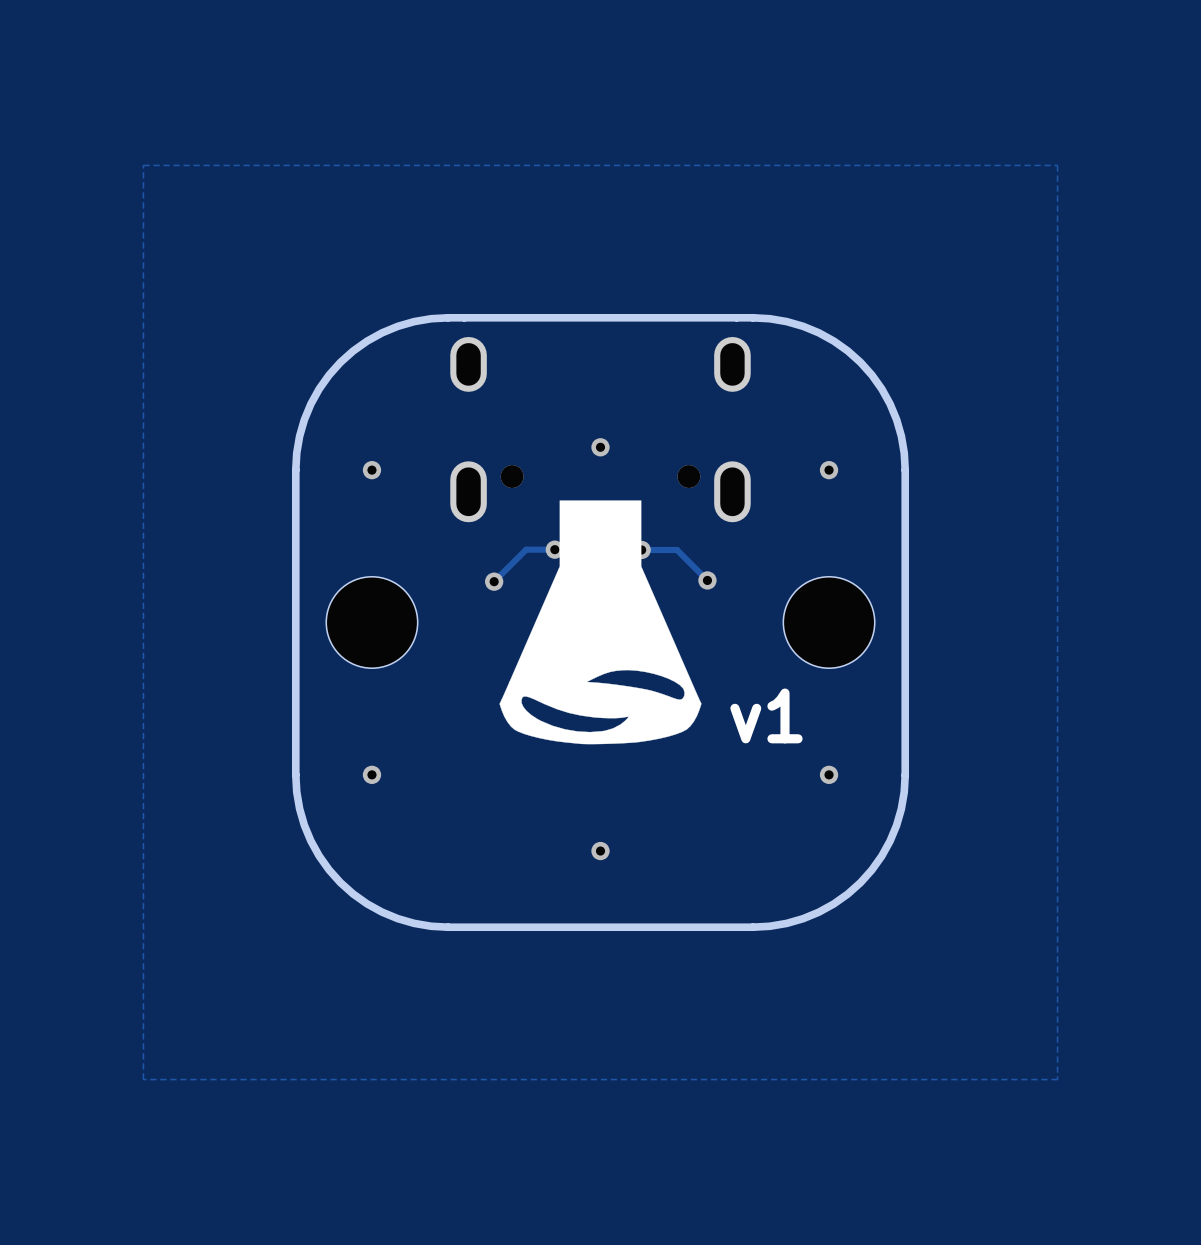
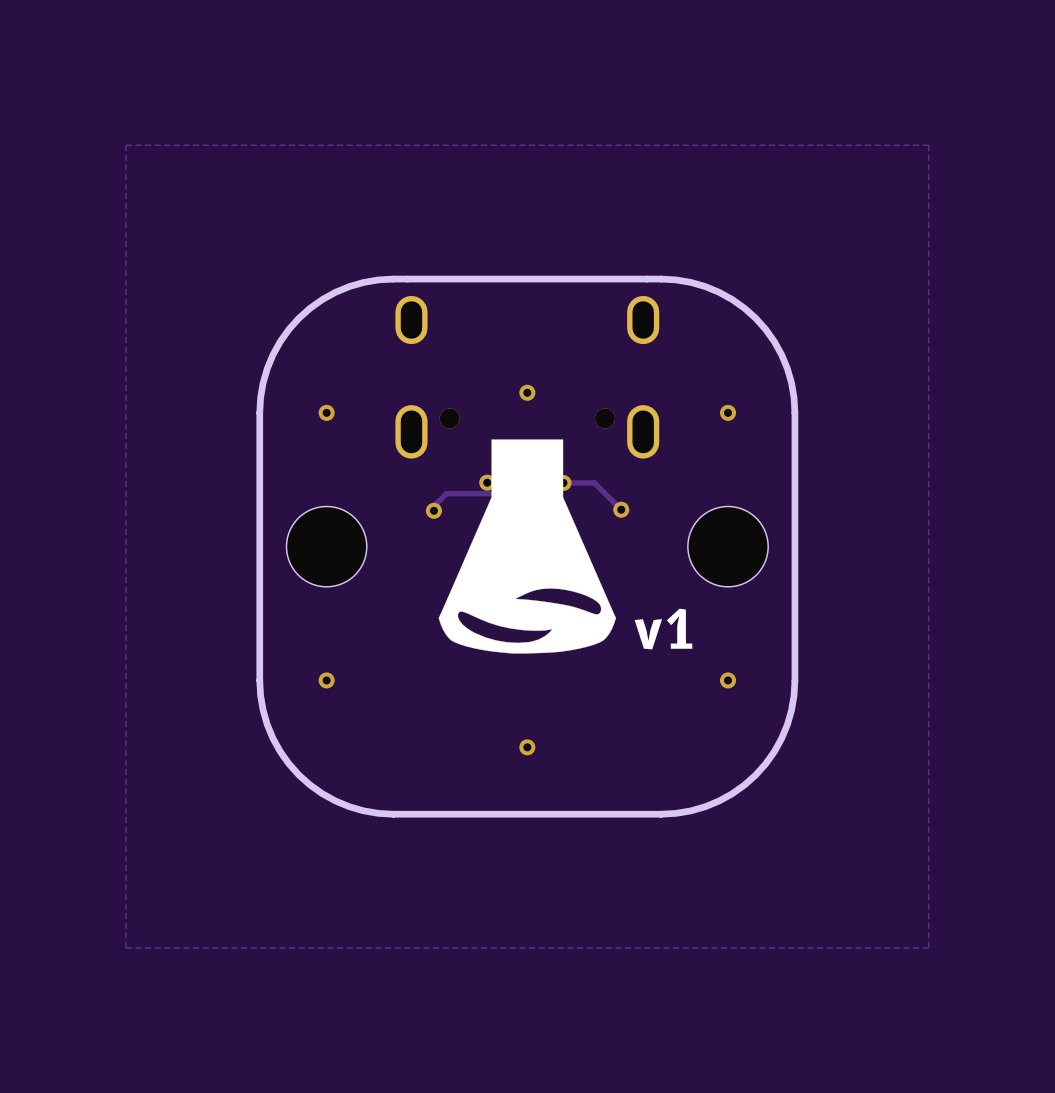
track: (554, 549) (526, 549) (494, 581) -> none
track: none -> (519, 493) (446, 493) (433, 506)

